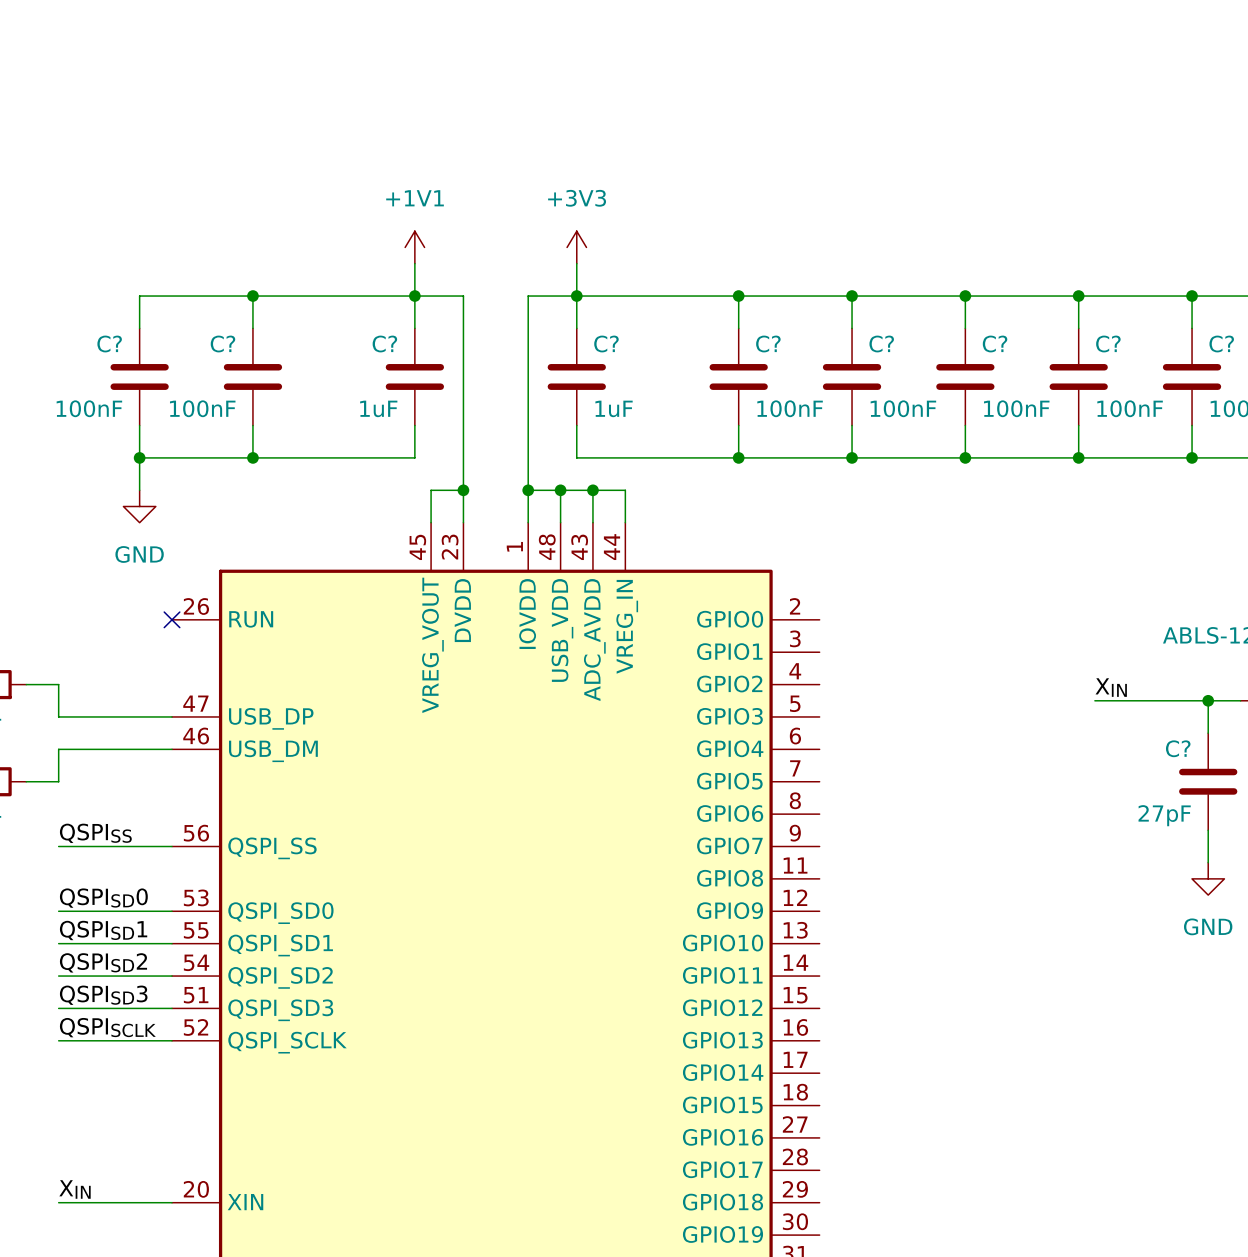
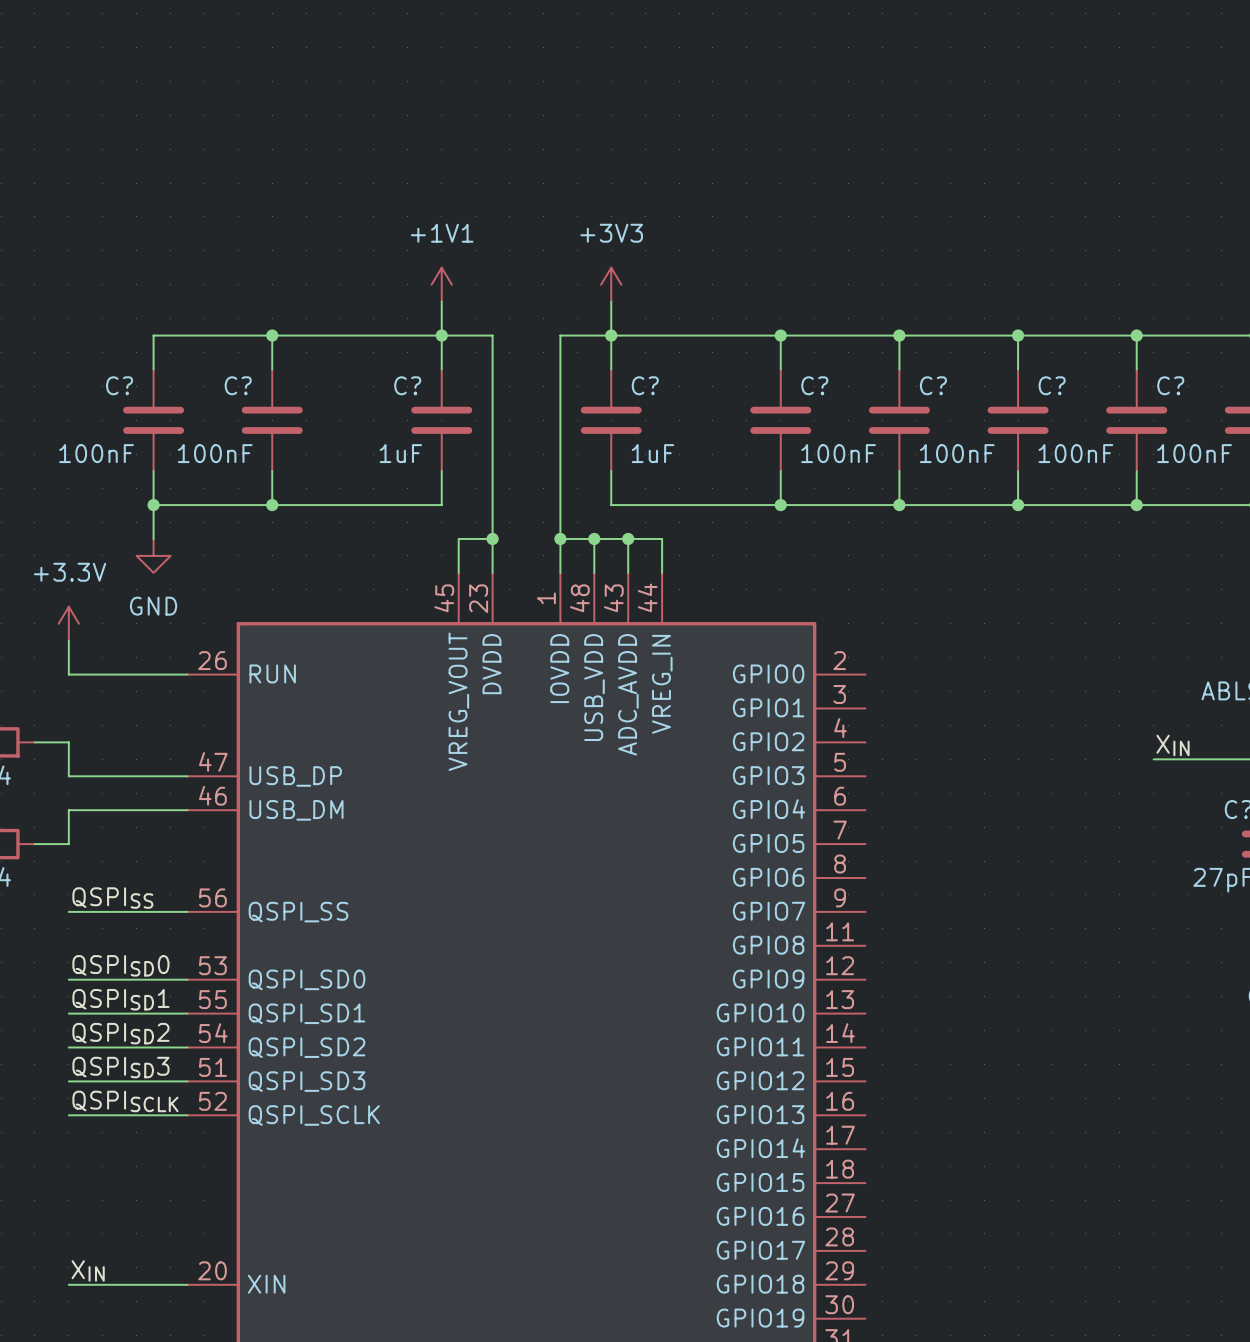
power symbol: none -> +3.3V (68, 623)
wire: none -> (68, 640) (68, 674) (187, 674)
no-connect mark: (172, 619) -> none

